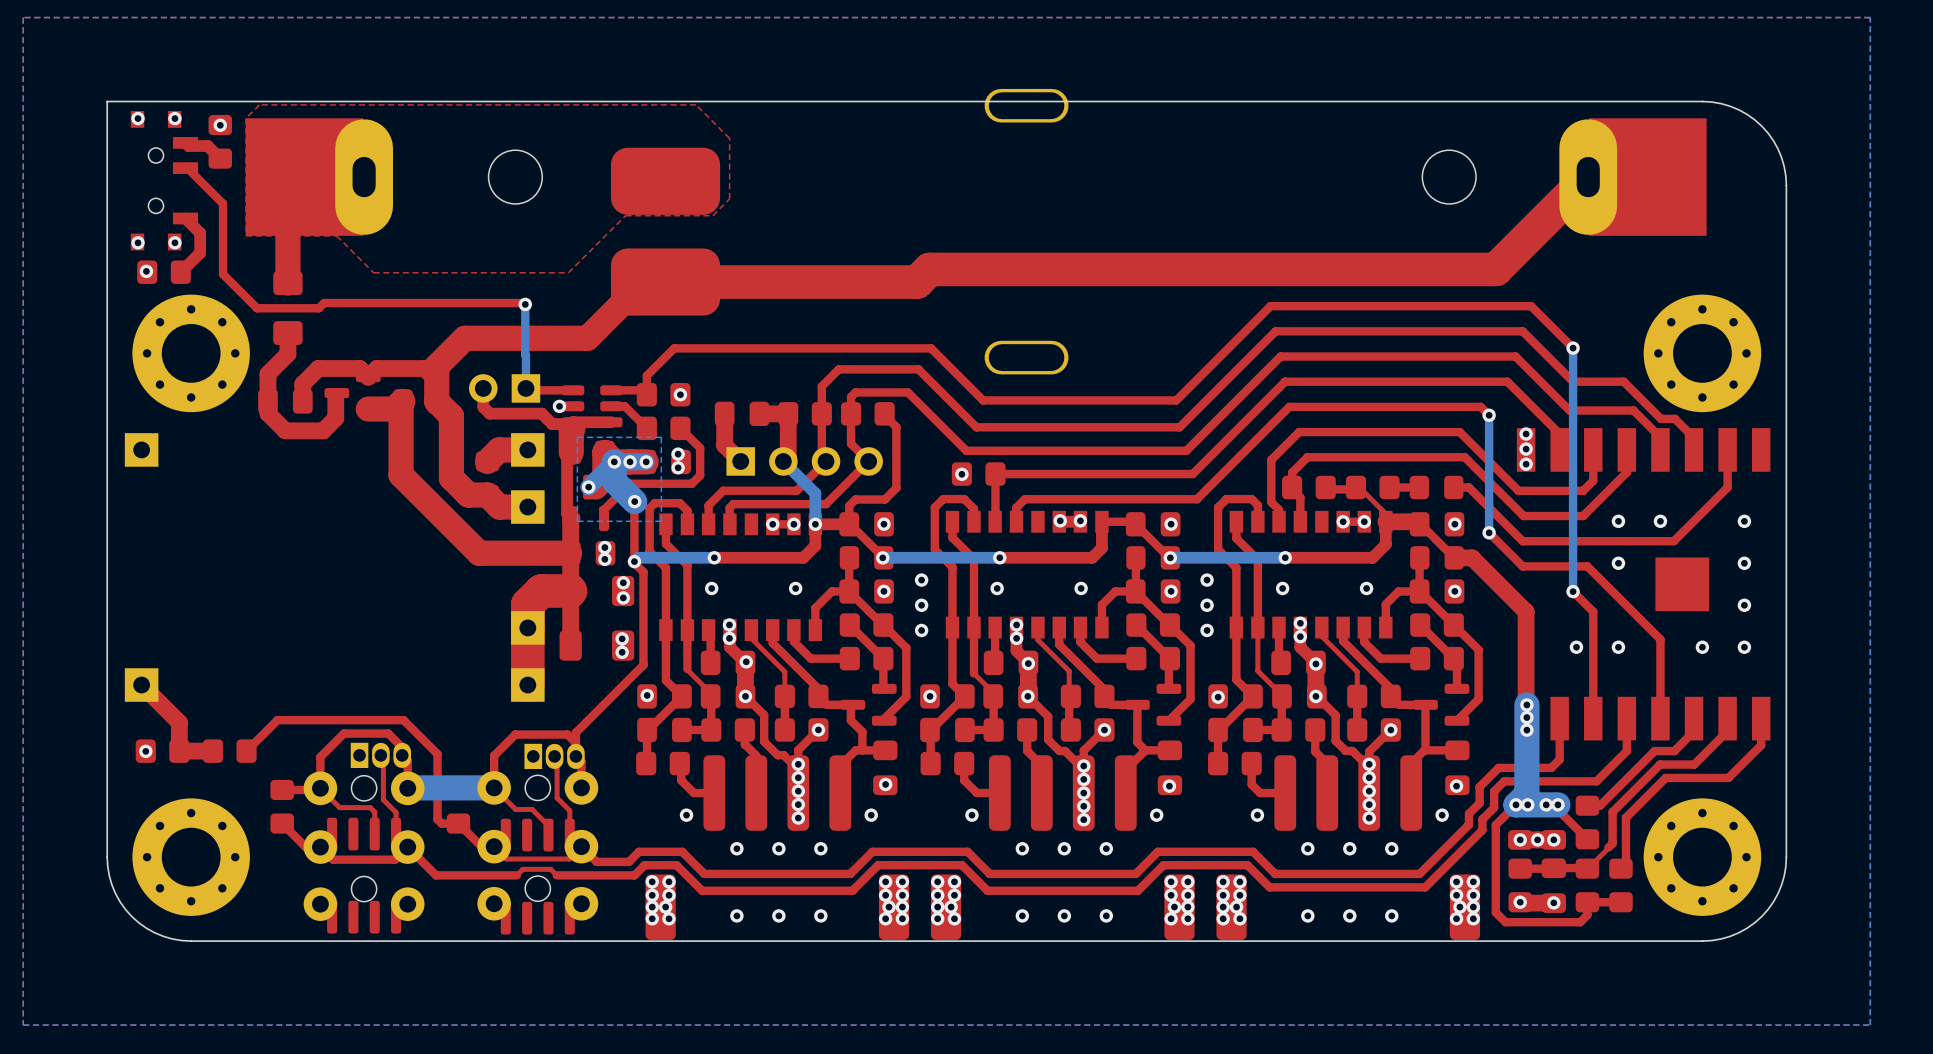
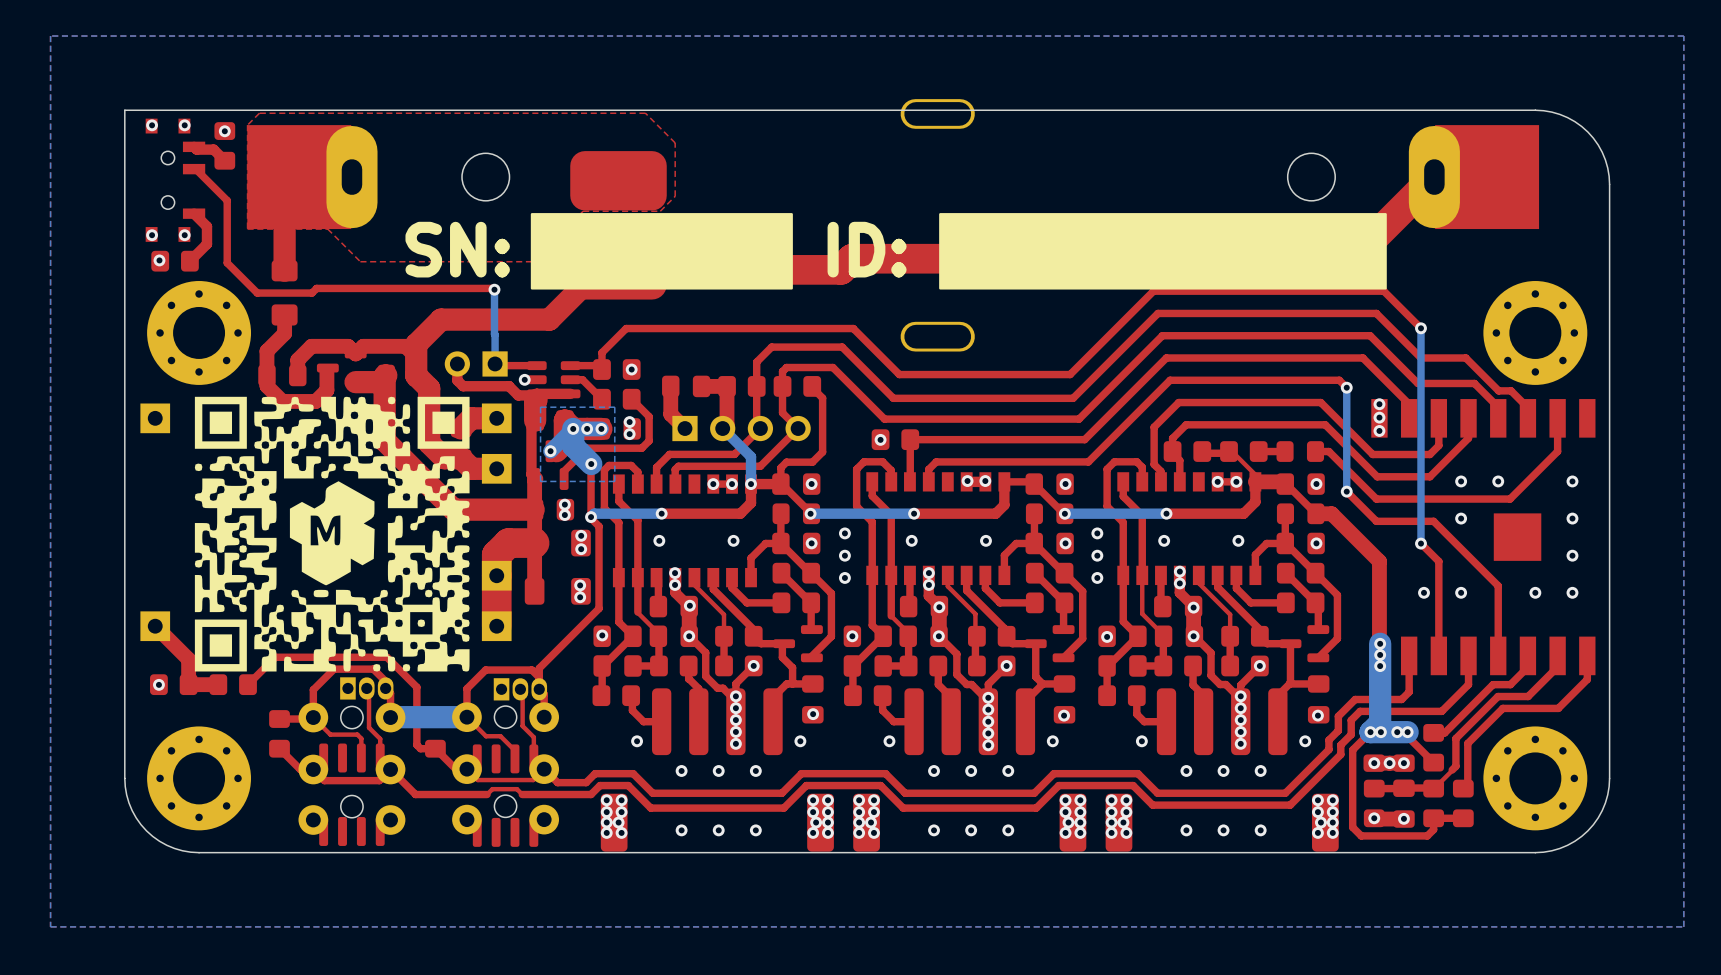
drawing: none -> [530, 213, 793, 290]
drawing: none -> [939, 213, 1387, 290]
text: none -> SN: (457, 249)
text: none -> ID: (867, 249)
drawing: none -> [194, 396, 470, 672]

